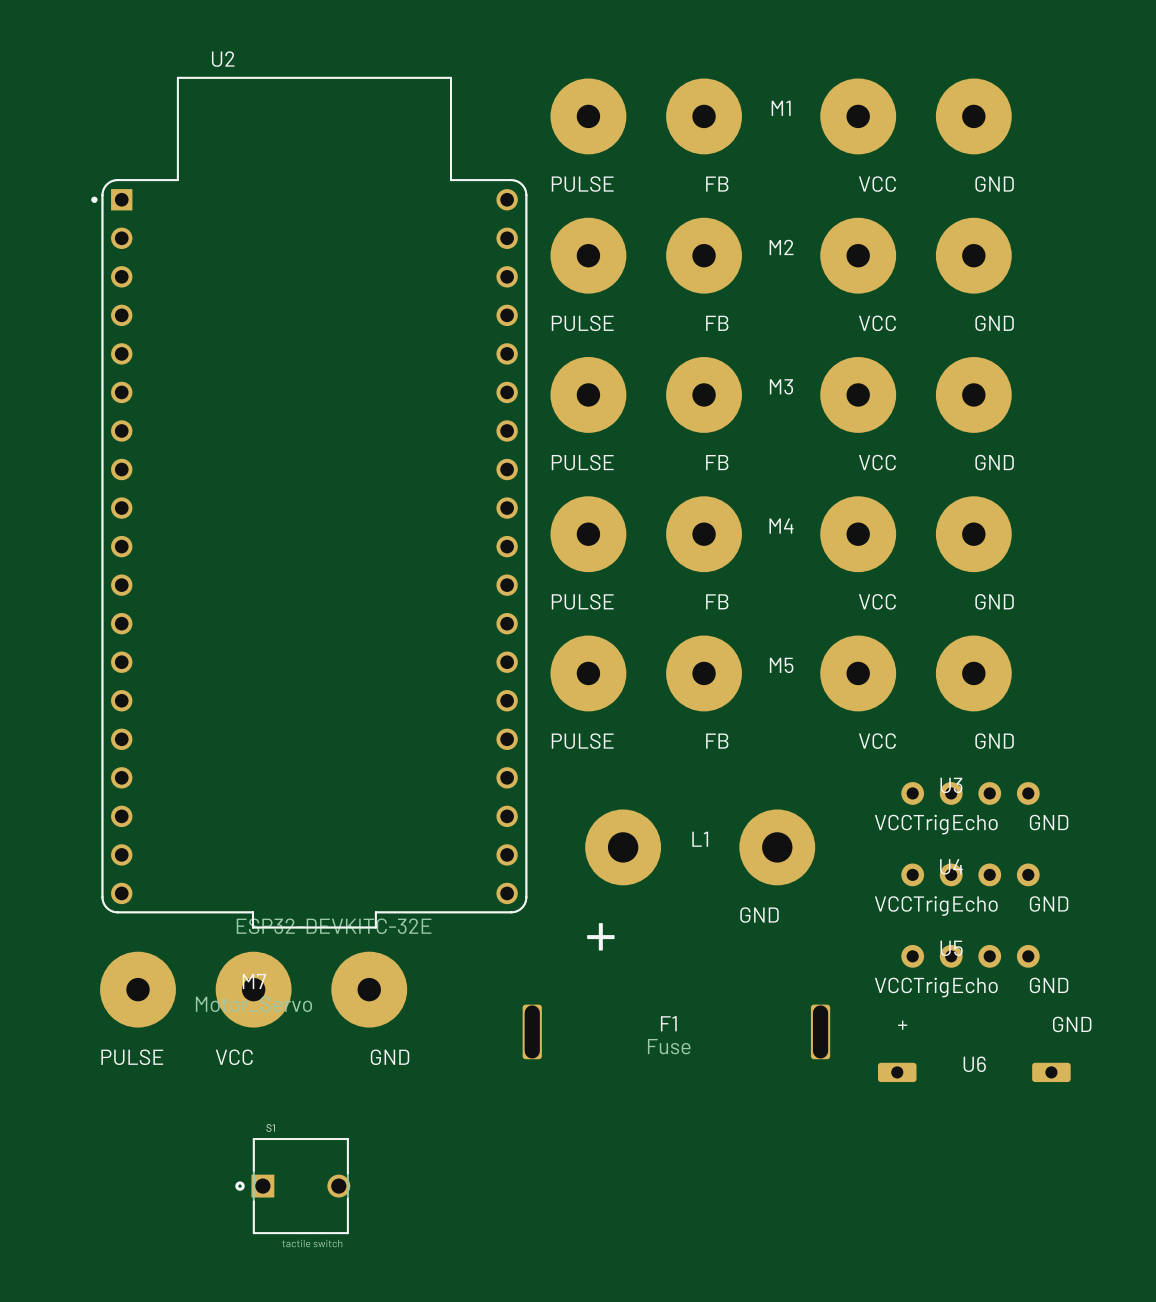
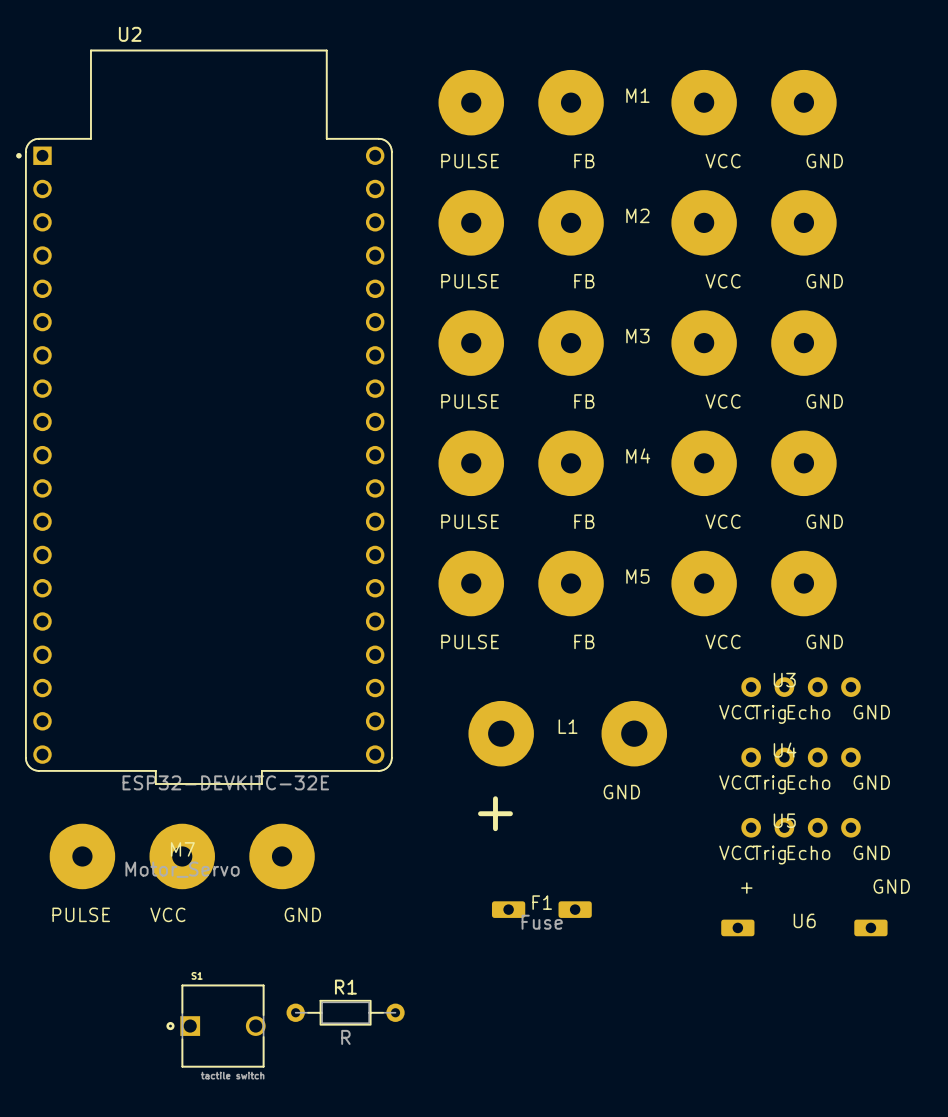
U2 position: (309, 502) -> (204, 417)
F1 footprint: [522, 1004, 831, 1060] -> [491, 901, 592, 918]
R1: none -> R (345, 1012)

